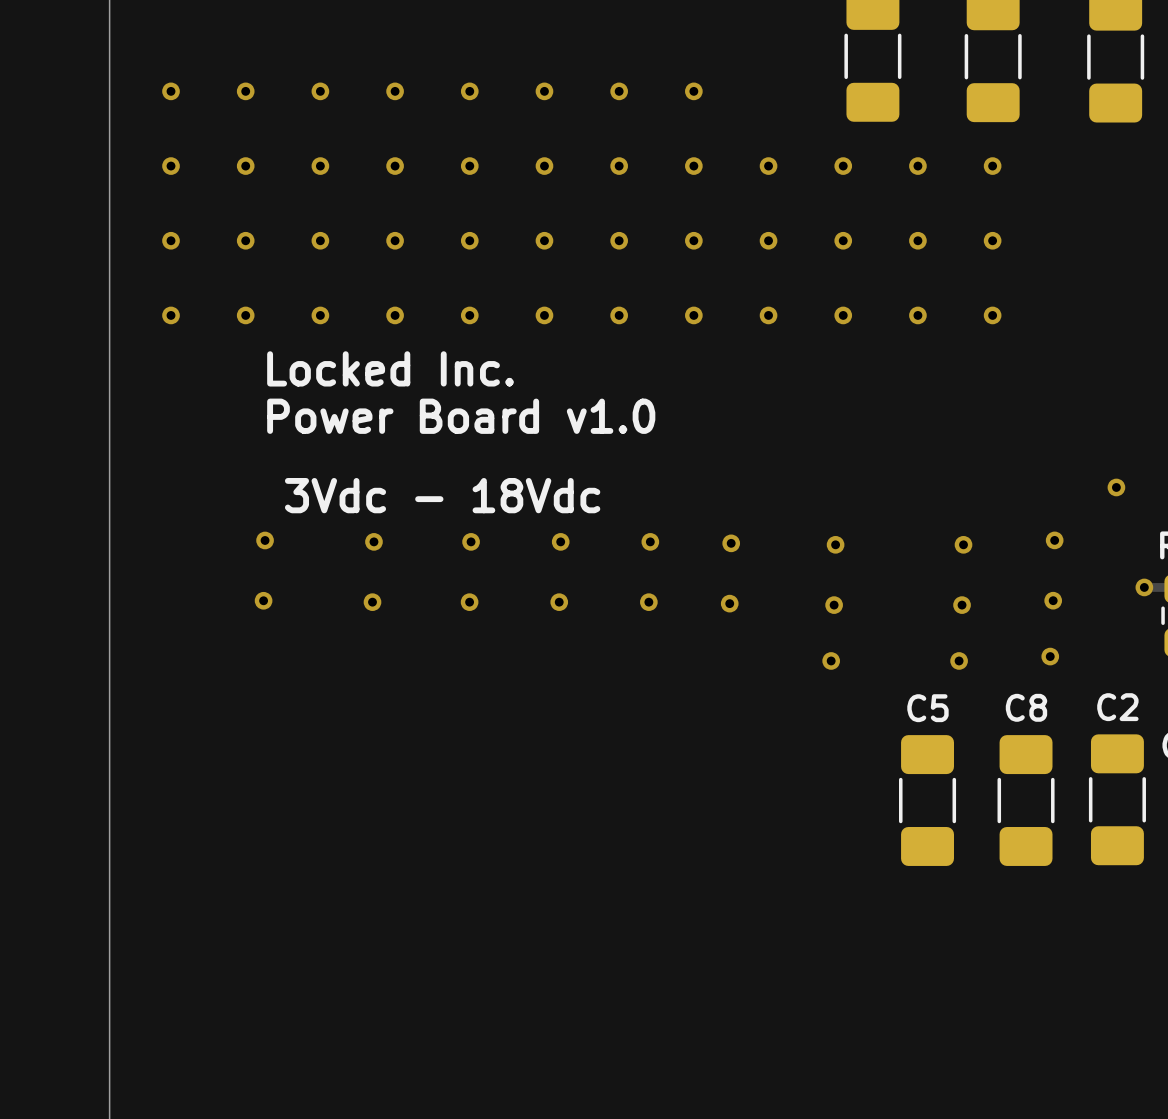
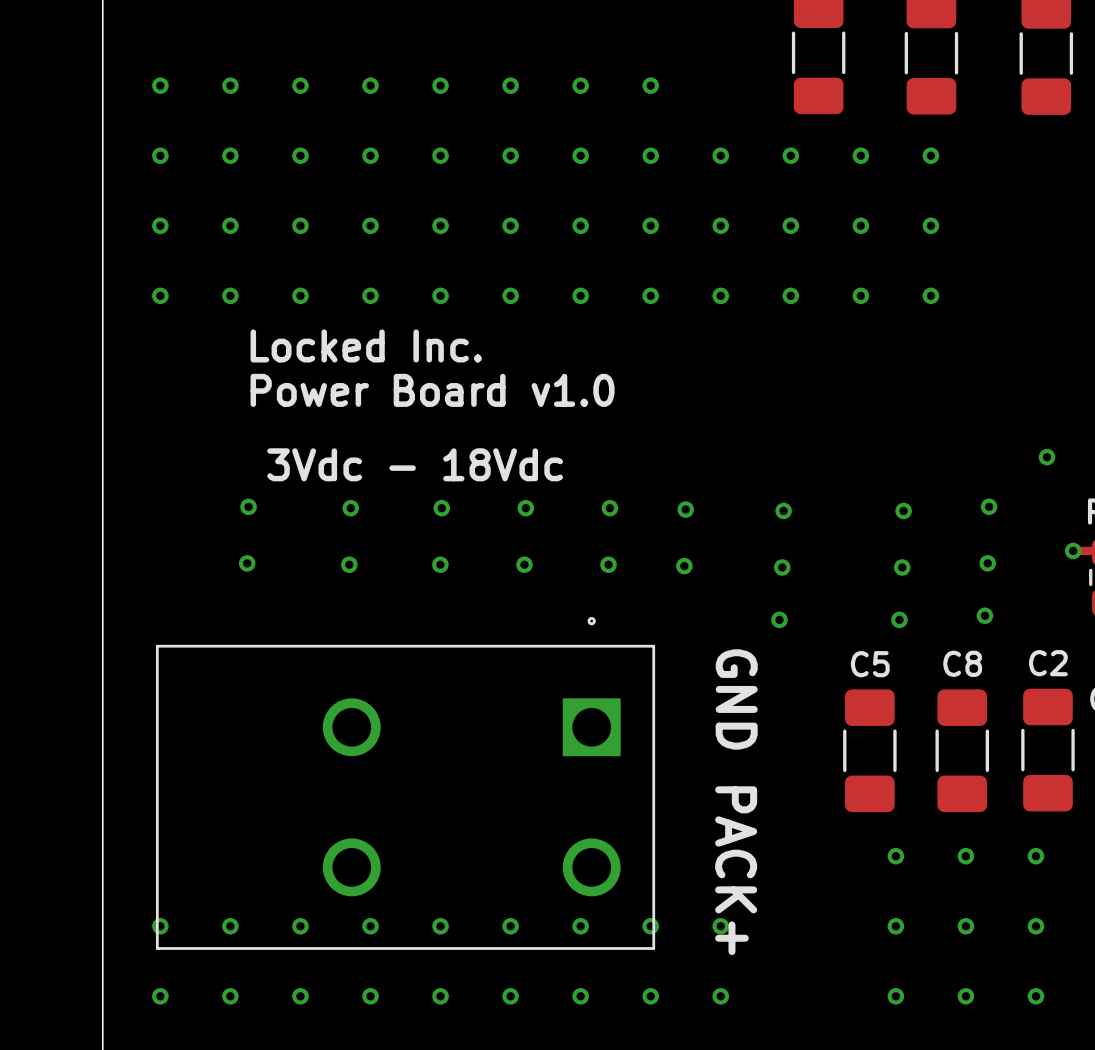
text: none -> GND (736, 699)
part: none -> (405, 783)
via: none -> (895, 856)
via: none -> (965, 856)
via: none -> (1035, 856)
text: none -> PACK+ (736, 870)
via: none -> (160, 926)
via: none -> (230, 926)
via: none -> (300, 926)
via: none -> (370, 926)
via: none -> (440, 926)
via: none -> (510, 926)
via: none -> (580, 926)
via: none -> (650, 926)
via: none -> (720, 926)
via: none -> (895, 926)
via: none -> (965, 926)
via: none -> (1035, 926)
via: none -> (160, 996)
via: none -> (230, 996)
via: none -> (300, 996)
via: none -> (370, 996)
via: none -> (440, 996)
via: none -> (510, 996)
via: none -> (580, 996)
via: none -> (650, 996)
via: none -> (720, 996)
via: none -> (895, 996)
via: none -> (965, 996)
via: none -> (1035, 996)

